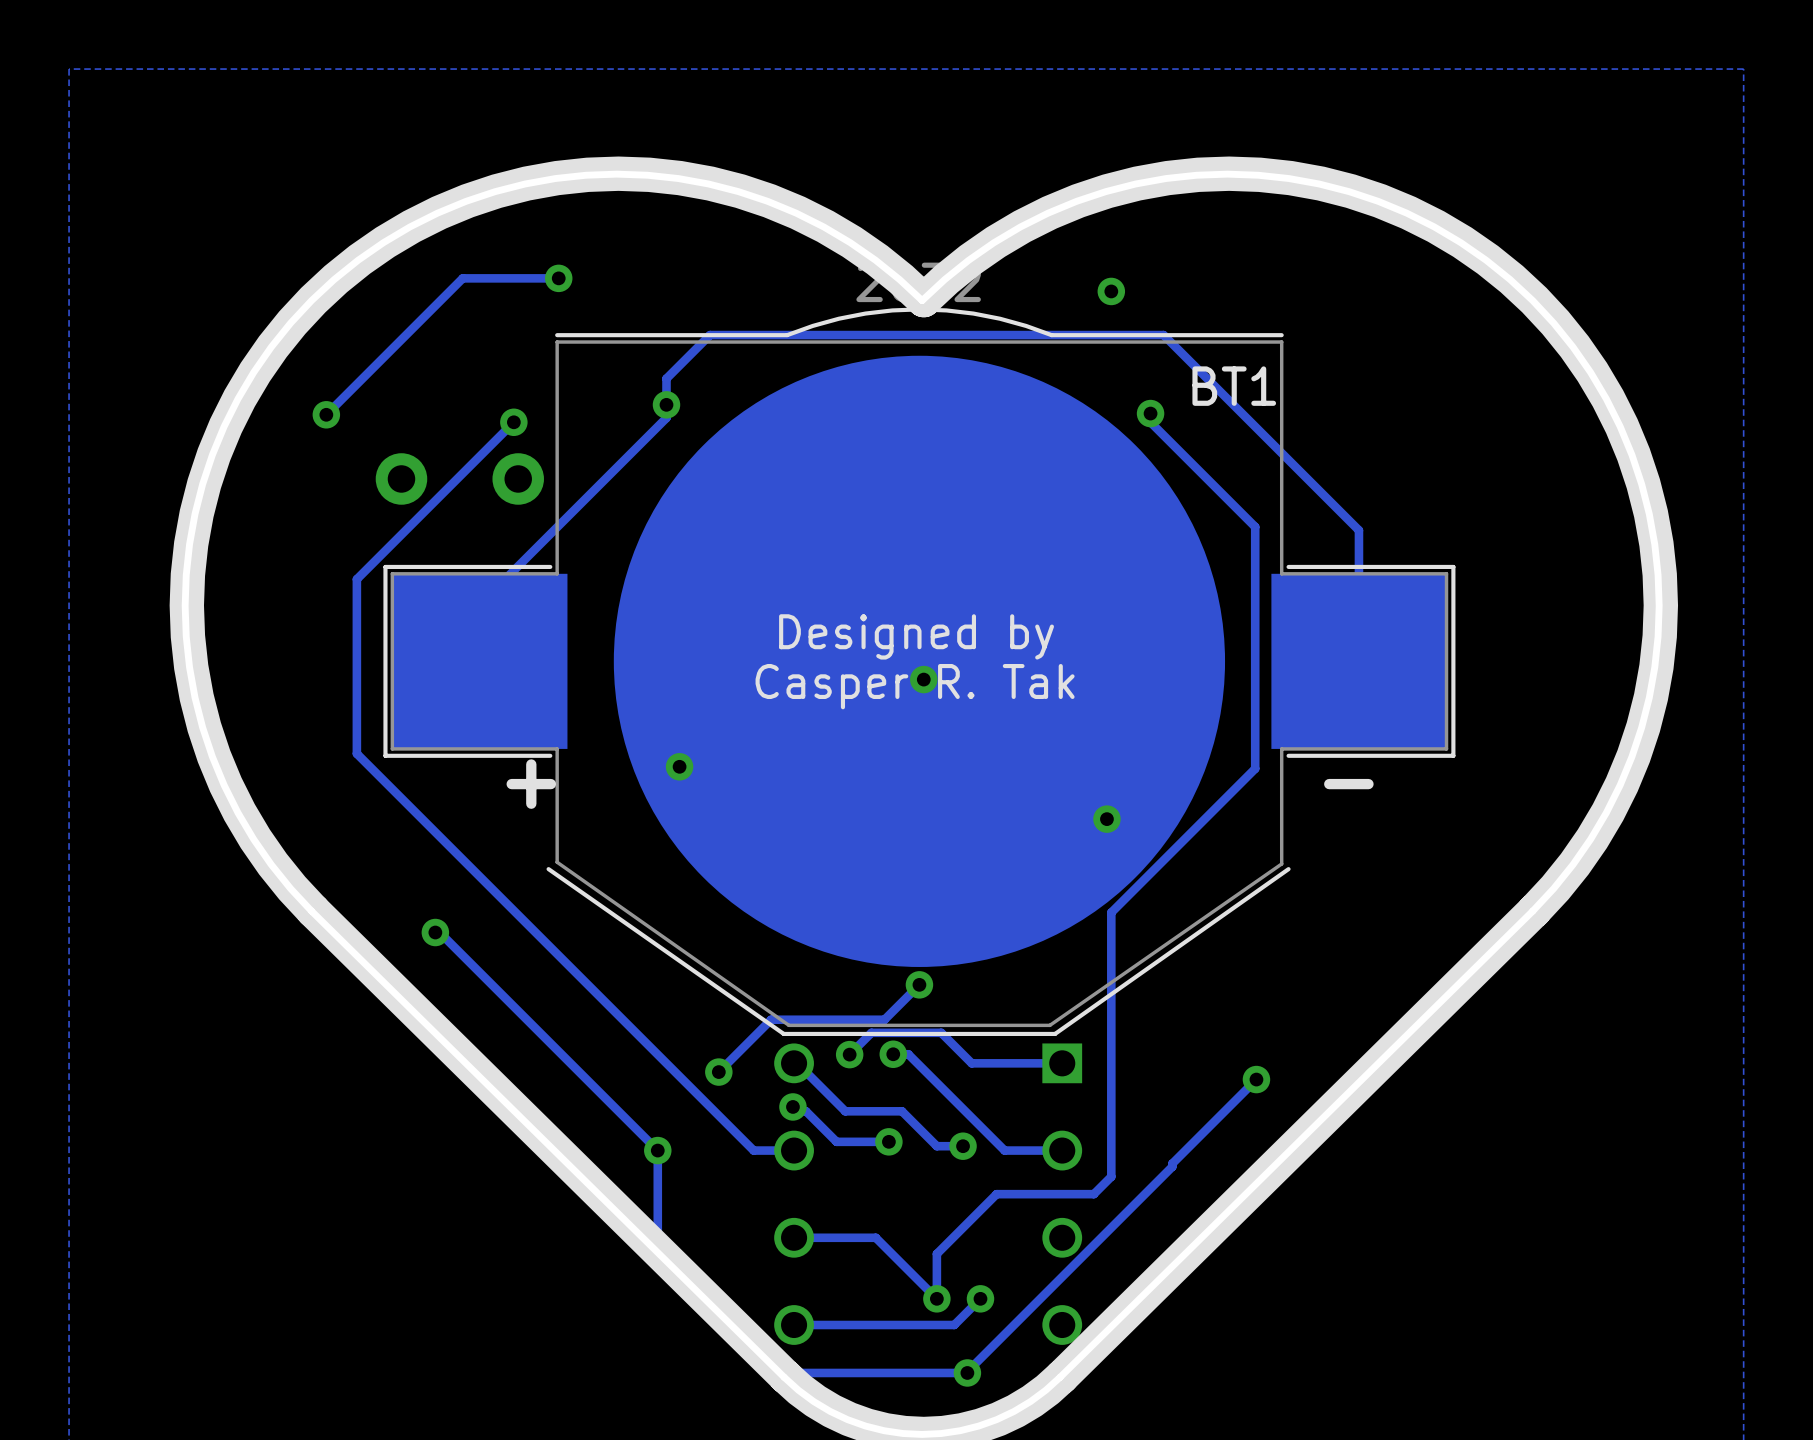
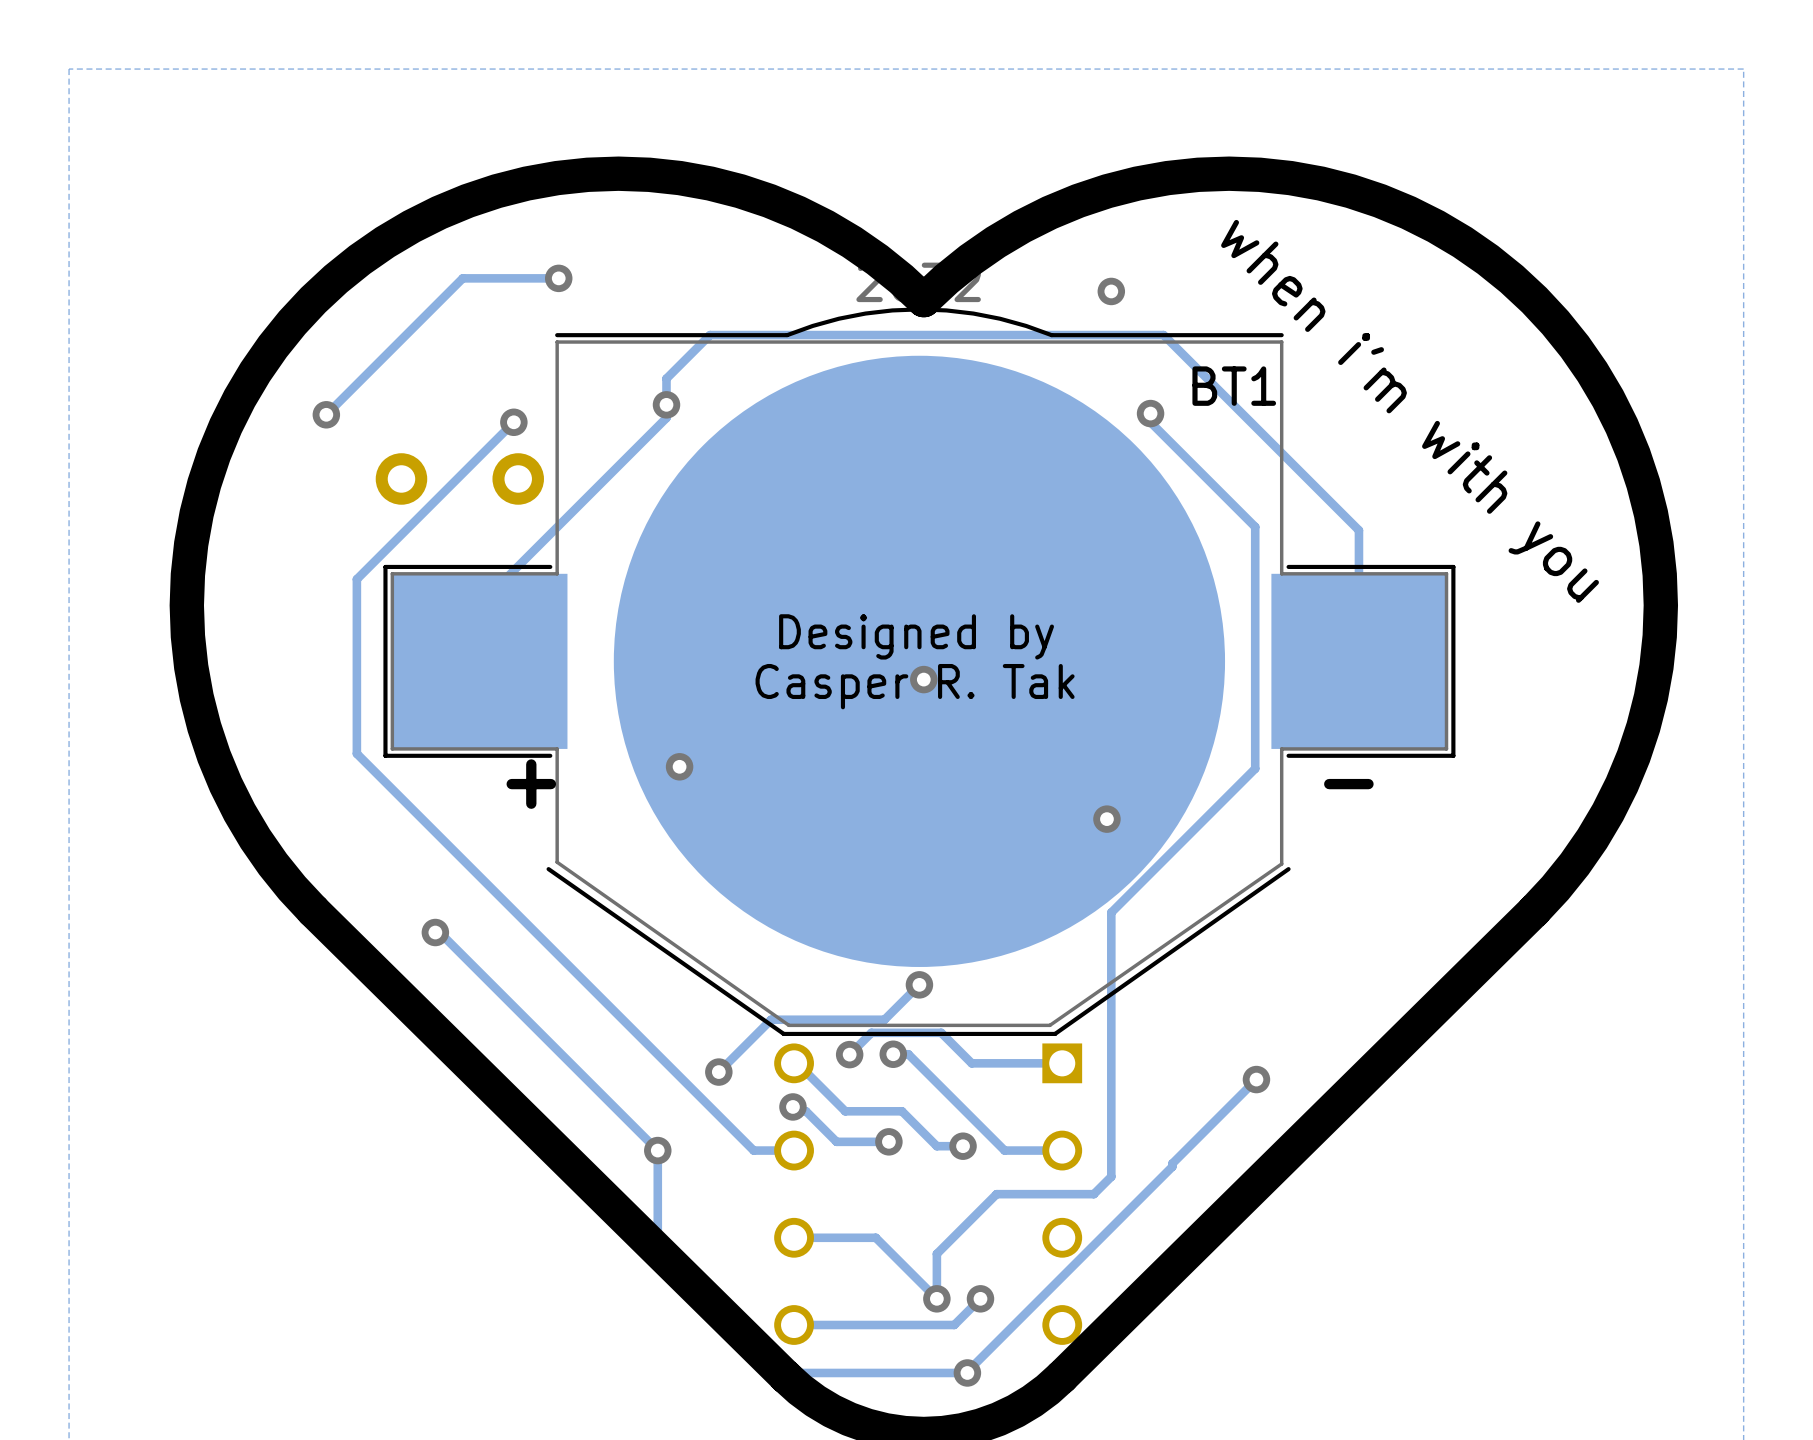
text: none -> when i'm with you (1410, 411)

